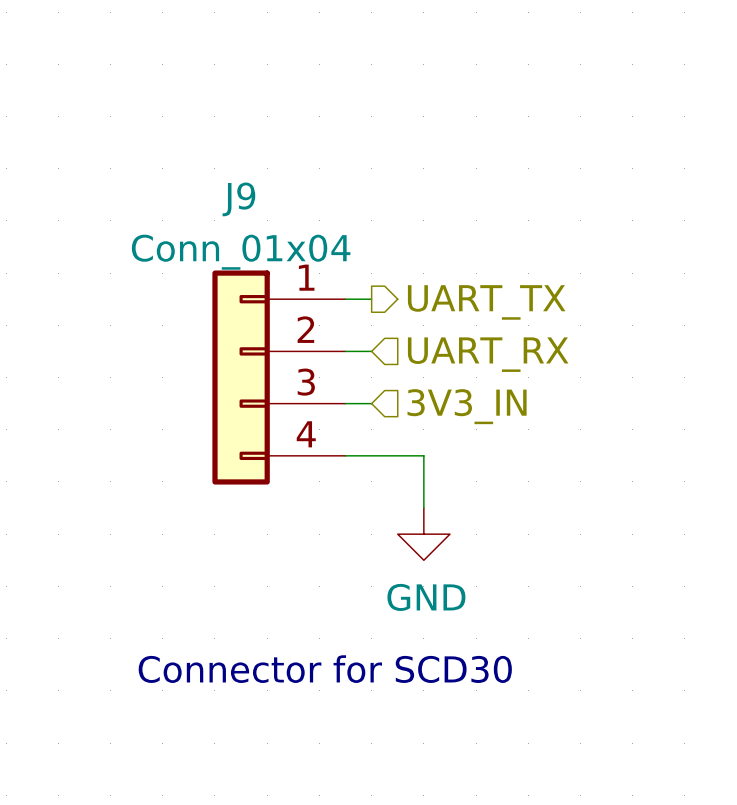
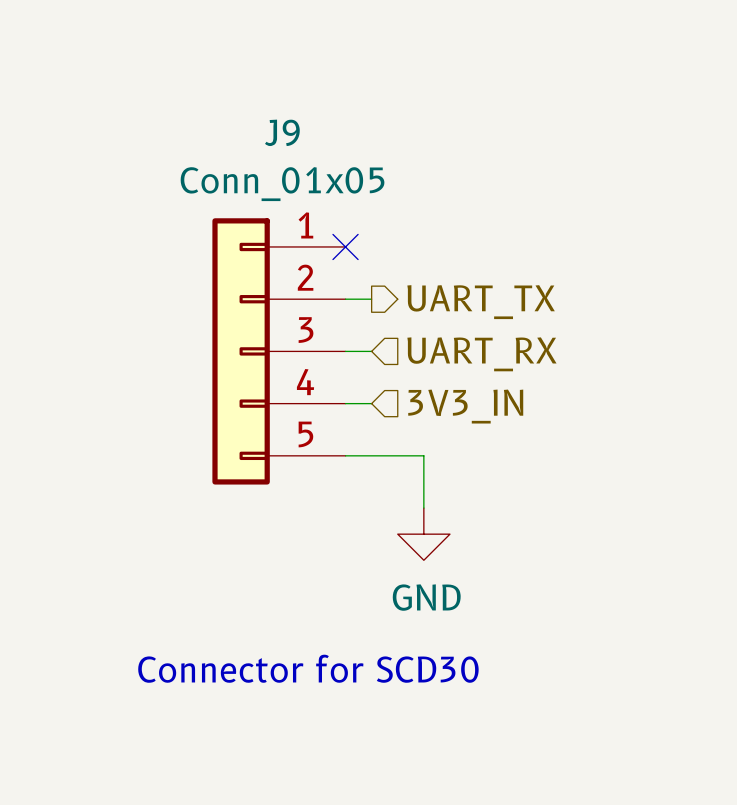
J9 name position: J9 (238, 199) -> J9 (282, 132)
no-connect mark: none -> (345, 246)
J9 value: Conn_01x04 (241, 252) -> Conn_01x05 (282, 184)
J9 symbol: [212, 270, 346, 485] -> [212, 218, 346, 485]

